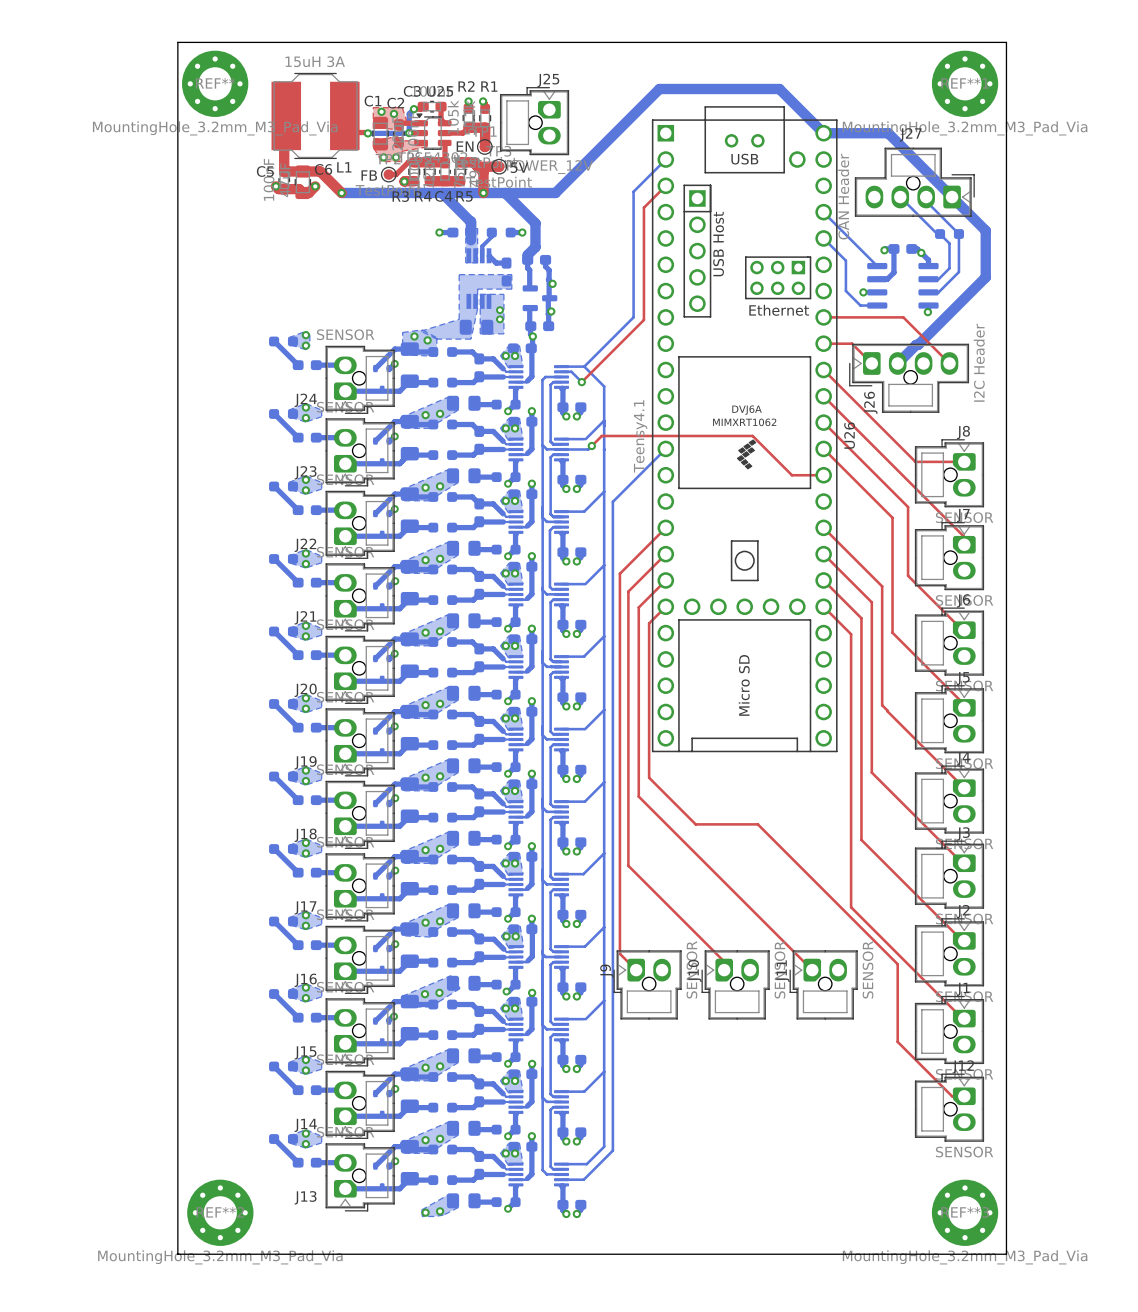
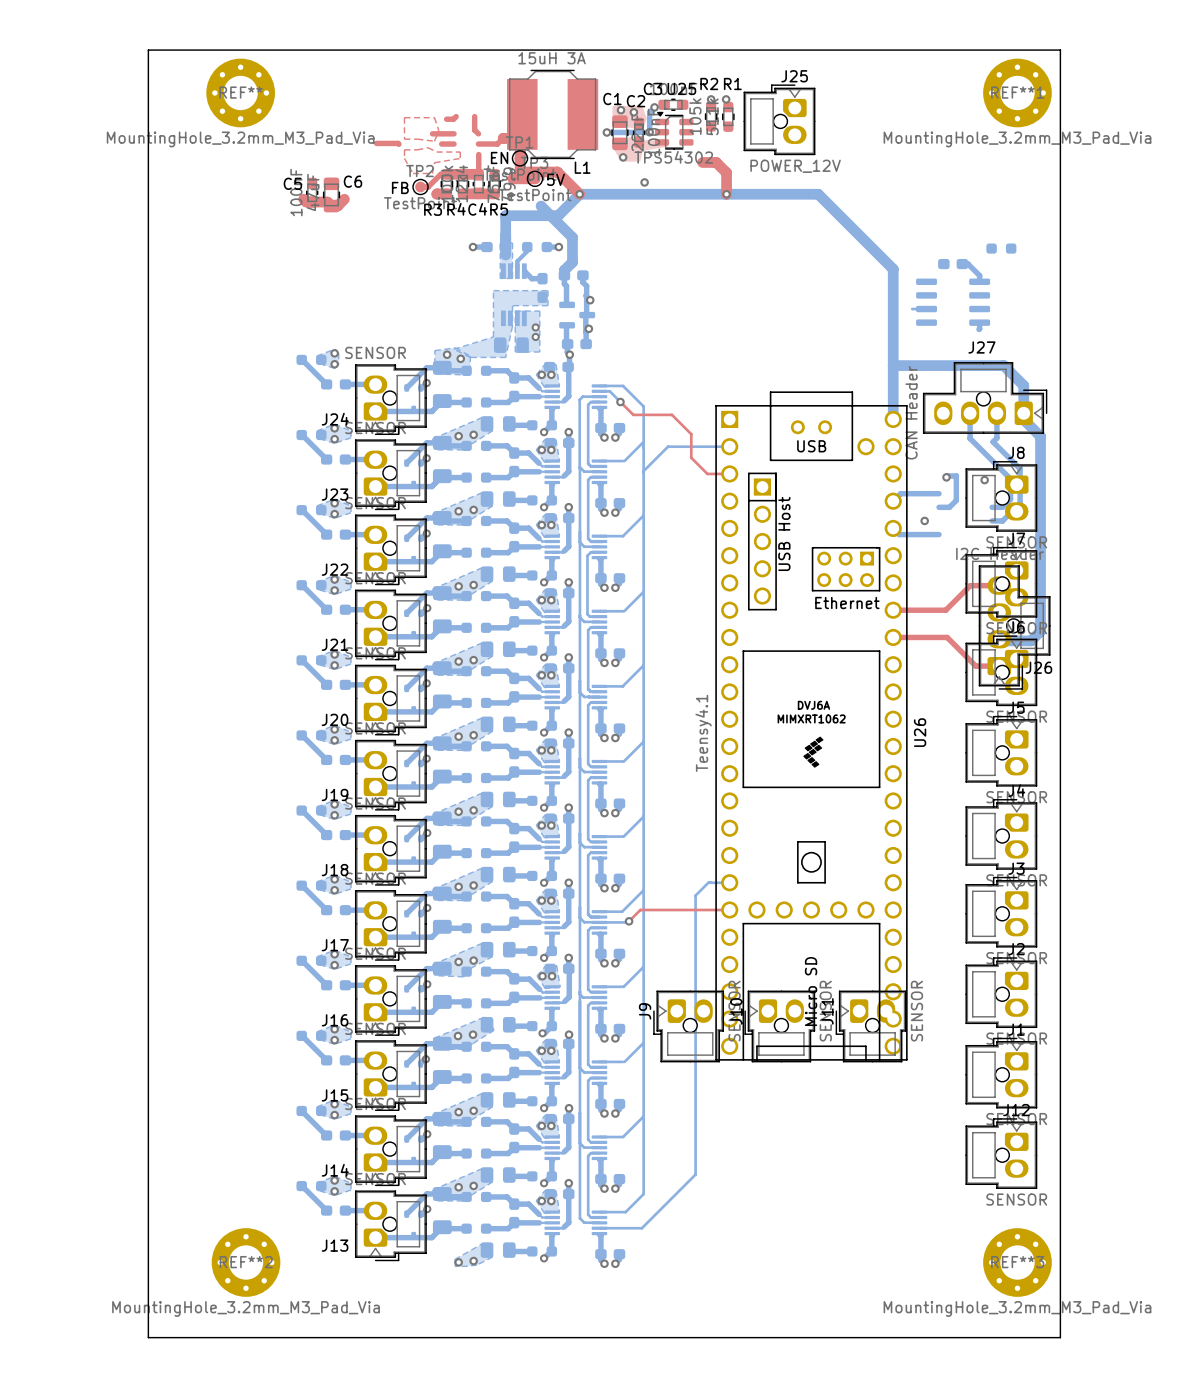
board edge: (177, 42) (177, 1254) (1006, 1254) -> (202, 50) (148, 50) (148, 1337) (1060, 1337) (1060, 1305)
via: none -> (711, 99)
via: none -> (726, 99)
via: none -> (654, 107)
via: none -> (621, 110)
via: (468, 101) -> none
via: (483, 101) -> none
via: none -> (633, 112)
C3 position: (432, 106) -> (673, 104)
bottom track: (413, 109) (409, 113) (408, 133) (367, 133) -> (654, 107) (649, 112) (649, 132) (606, 132)
via: (413, 109) -> none
via: (381, 111) -> none
via: (394, 113) -> none
L1 position: (315, 115) -> (552, 114)
top track: (284, 118) (284, 171) (320, 171) (341, 193) -> (520, 116) (520, 171) (557, 171) (579, 194)
R2 position: (468, 118) -> (711, 116)
R1 position: (485, 118) -> (728, 116)
J25 position: (534, 121) -> (779, 119)
via: none -> (606, 132)
via: none -> (649, 132)
U25 position: (432, 131) -> (674, 130)
via: (367, 133) -> none
C1 position: (380, 133) -> (619, 132)
C2 position: (398, 133) -> (639, 132)
via: (409, 133) -> none
via: none -> (623, 157)
via: (383, 157) -> none
via: (396, 157) -> none
bottom track: (665, 159) (633, 191) (633, 317) (584, 366) -> none
top track: (460, 162) (473, 162) (483, 172) (483, 193) -> (702, 162) (716, 162) (726, 172) (726, 194)
via: none -> (644, 182)
via: (404, 181) -> none
via: none -> (579, 194)
via: none -> (726, 194)
J27 position: (914, 182) -> (985, 397)
top track: (665, 185) (643, 207) (643, 319) (581, 382) -> (729, 473) (707, 473) (691, 457) (691, 434) (671, 414) (633, 414) (620, 402)
via: (275, 186) -> none
via: (315, 186) -> none
bottom track: (341, 193) (555, 193) (659, 89) (779, 89) (823, 133) (888, 133) (985, 230) (985, 277) (897, 363) -> none
via: (341, 193) -> none
bottom track: (441, 193) (471, 221) -> (893, 419) (893, 269) (818, 194) (579, 194) (558, 215) (505, 215) (505, 235)
via: (483, 193) -> none
bottom track: (900, 197) (937, 234) (940, 234) (949, 243) (949, 268) (938, 279) (928, 279) -> none
bottom track: (926, 197) (926, 201) (958, 234) (958, 272) (938, 292) (928, 292) -> none
bottom track: (823, 212) (877, 265) -> none
bottom track: (823, 238) (845, 260) (845, 290) (860, 305) (877, 305) -> none
bottom track: (884, 250) (893, 248) (893, 272) (887, 279) (877, 279) -> (946, 477) (956, 475) (956, 500) (949, 507) (939, 507)
via: (884, 250) -> none
via: (921, 252) -> none
via: (863, 292) -> none
via: (927, 312) -> none
top track: (823, 317) (903, 317) (949, 363) -> none
top track: (823, 343) (852, 343) (871, 363) -> none
bottom track: none -> (893, 365) (1003, 365) (1023, 385) (1023, 419) (1040, 436) (1040, 631) (1030, 640) (1000, 640) (999, 639)
top track: (823, 370) (915, 461) (964, 461) -> none
J26 rotation: 0° (909, 378) -> 90° counterclockwise (1014, 627)
J26 position: (909, 378) -> (1014, 627)
bottom track: none -> (970, 413) (970, 438) (1010, 478) (1010, 499) (1002, 507) (992, 507)
bottom track: none -> (996, 413) (996, 438) (993, 441) (1020, 468) (1020, 503) (1002, 520) (992, 520)
top track: (823, 396) (964, 536) (964, 544) -> none
top track: (823, 422) (908, 507) (908, 575) (964, 630) -> none
bottom track: none -> (729, 446) (668, 446) (643, 471)
U26 position: (744, 429) -> (811, 726)
top track: (591, 446) (601, 435) (752, 435) (791, 475) (823, 475) -> none
bottom track: (591, 446) (588, 449) (561, 449) -> none
via: (591, 446) -> none
bottom track: (665, 448) (612, 501) (612, 1150) (583, 1179) -> (729, 882) (708, 882) (695, 895) (695, 1174) (641, 1228) (622, 1228)
top track: (823, 448) (892, 517) (892, 632) (964, 704) (964, 707) -> none
via: none -> (946, 477)
via: none -> (984, 480)
bottom track: none -> (939, 493) (900, 493) (893, 501)
via: none -> (924, 520)
bottom track: none -> (893, 528) (899, 534) (939, 534)
top track: (665, 527) (619, 573) (619, 953) (636, 970) -> none
top track: (823, 527) (882, 586) (882, 705) (964, 788) -> none
top track: (665, 554) (628, 591) (628, 865) (724, 961) (724, 970) -> none
top track: (823, 554) (871, 602) (871, 772) (964, 863) -> none
top track: none -> (999, 585) (970, 585) (945, 610) (893, 610)
top track: (665, 580) (638, 607) (638, 796) (812, 970) -> none
top track: (823, 580) (861, 618) (861, 839) (964, 940) -> none
top track: (665, 606) (649, 623) (649, 777) (695, 824) (757, 824) (897, 964) (897, 1041) (952, 1096) (964, 1096) -> none
top track: (823, 606) (851, 634) (851, 907) (964, 1018) -> none
top track: none -> (893, 637) (947, 637) (975, 666) (999, 666)
top track: none -> (729, 910) (640, 910) (629, 921)
bottom track: none -> (629, 921) (599, 922)
via: none -> (629, 921)

